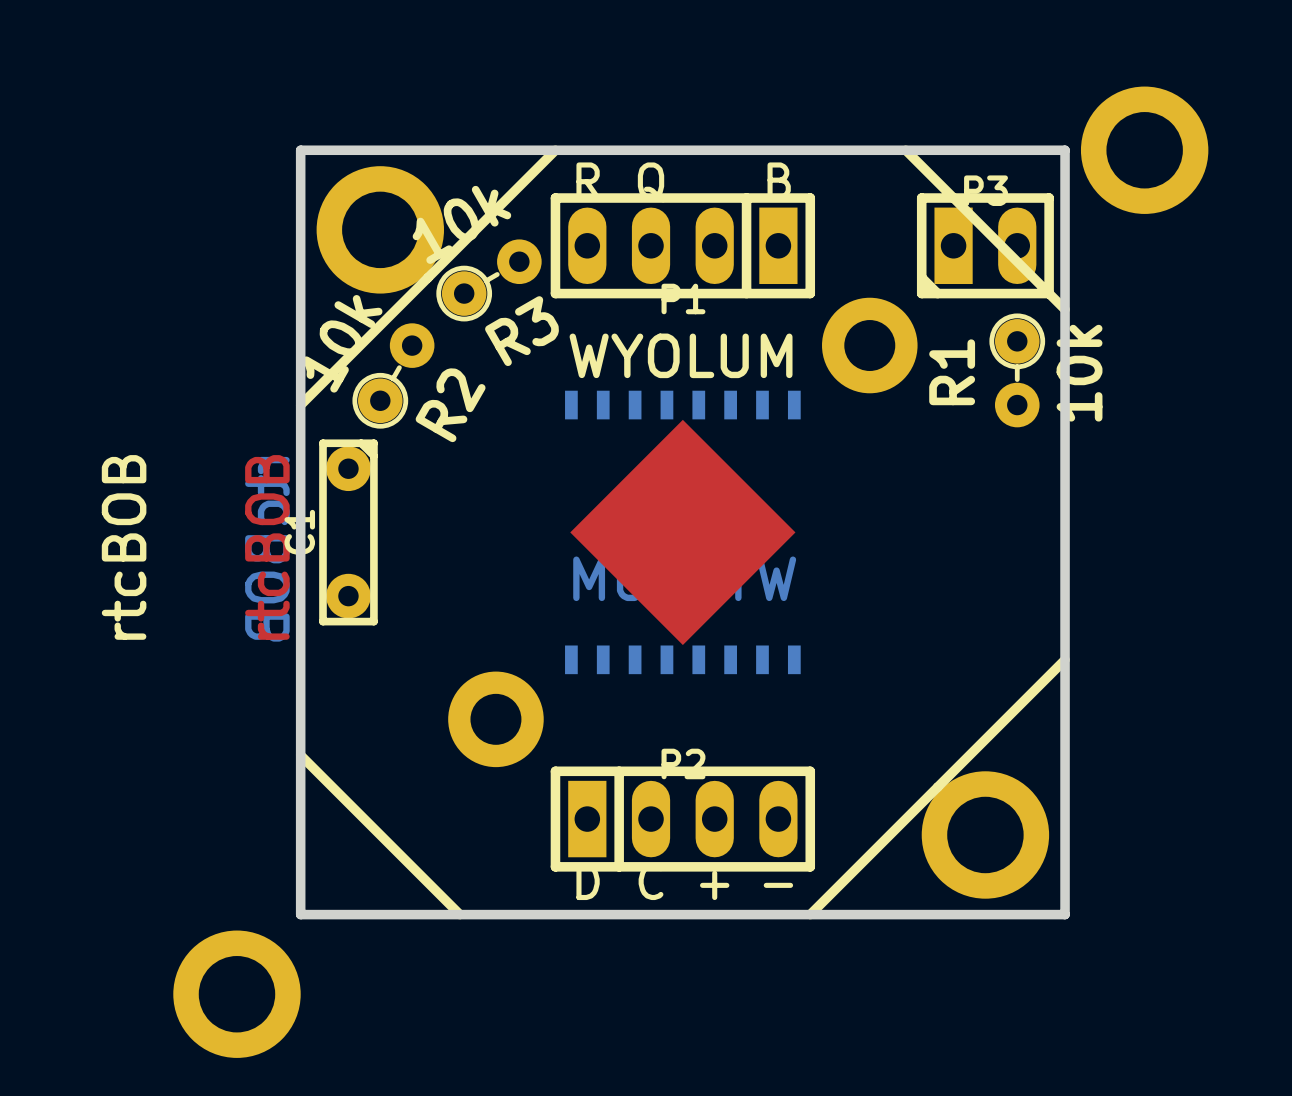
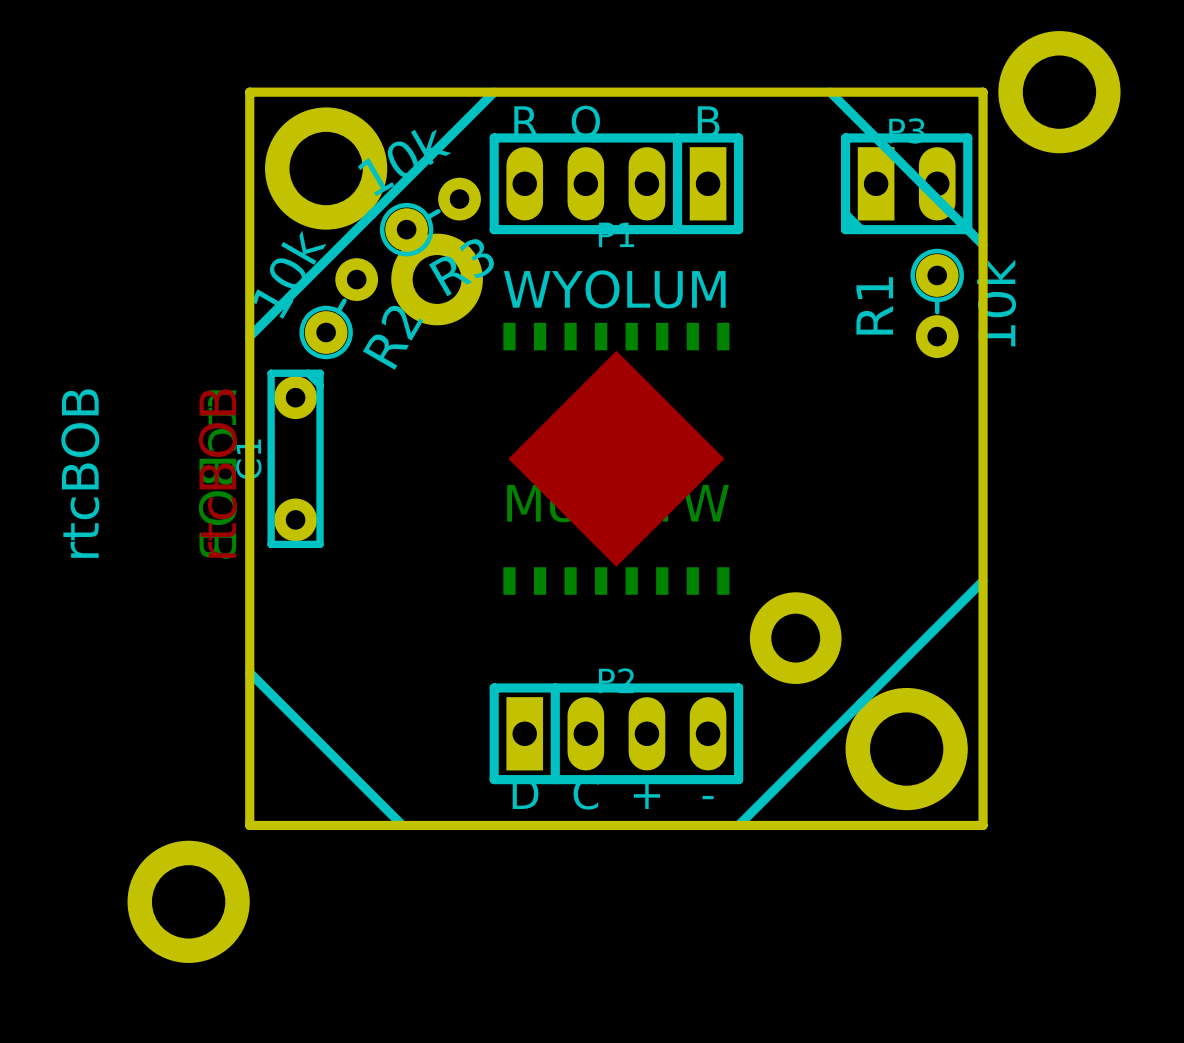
part rotation: 0° (682, 532) -> 90° clockwise (616, 458)

